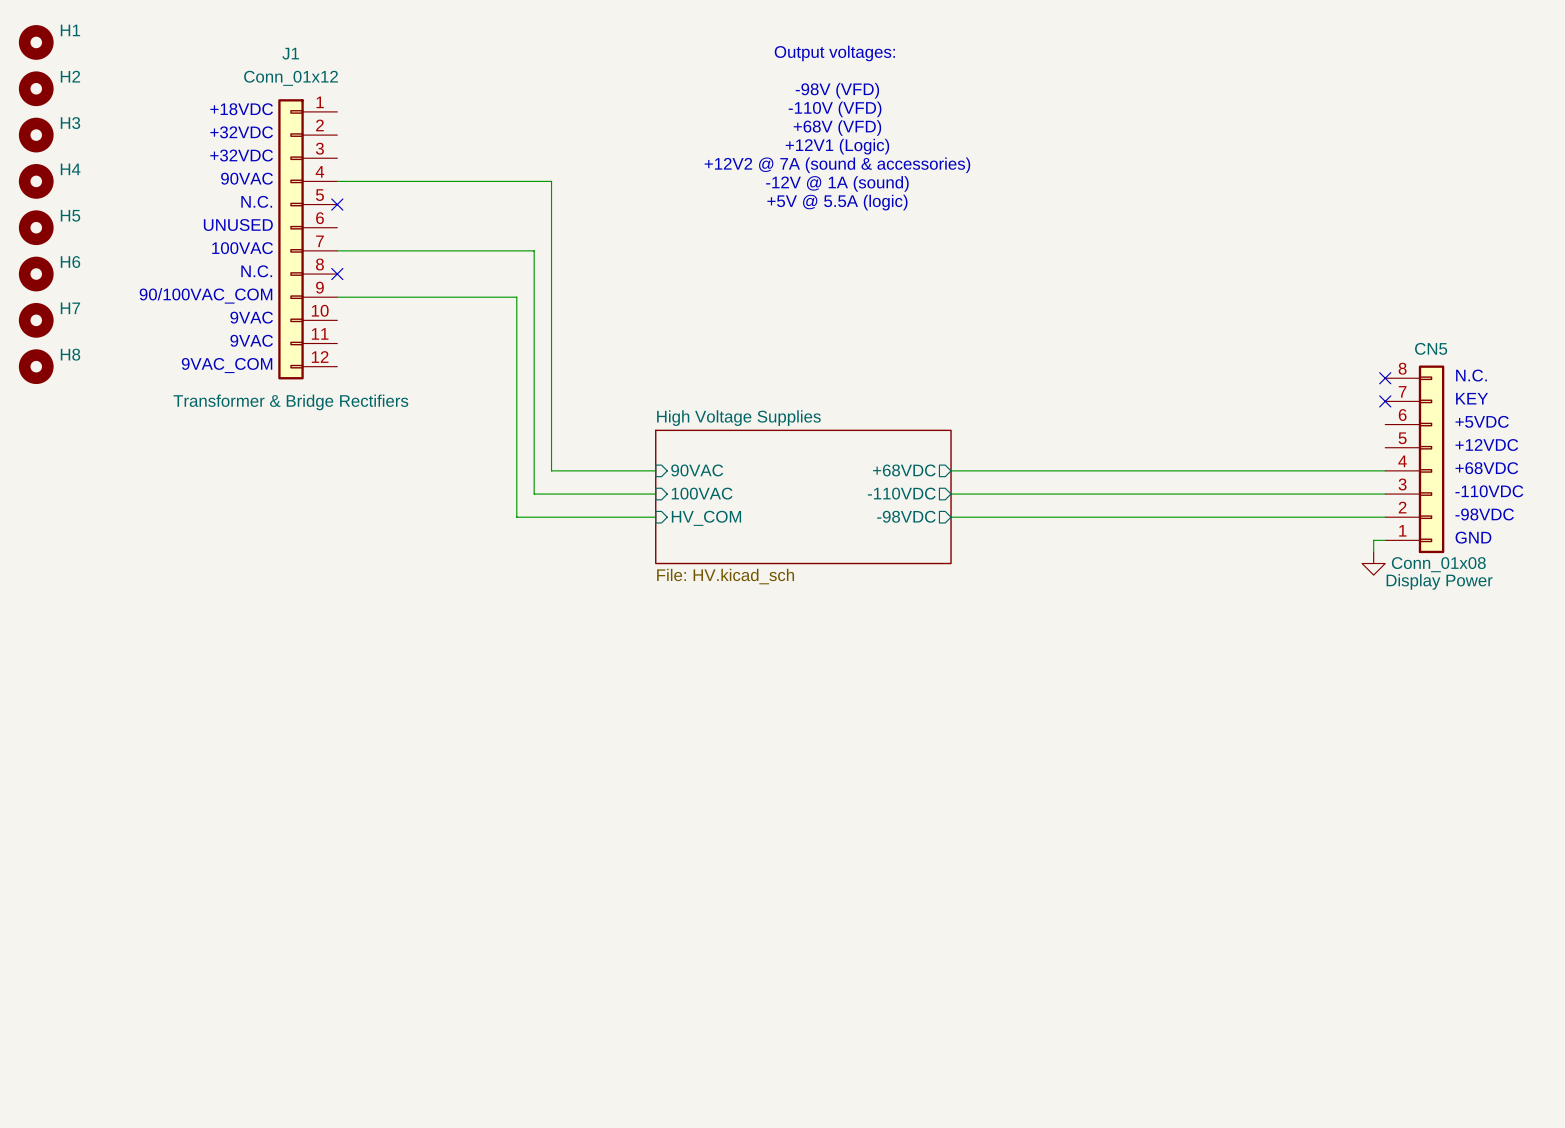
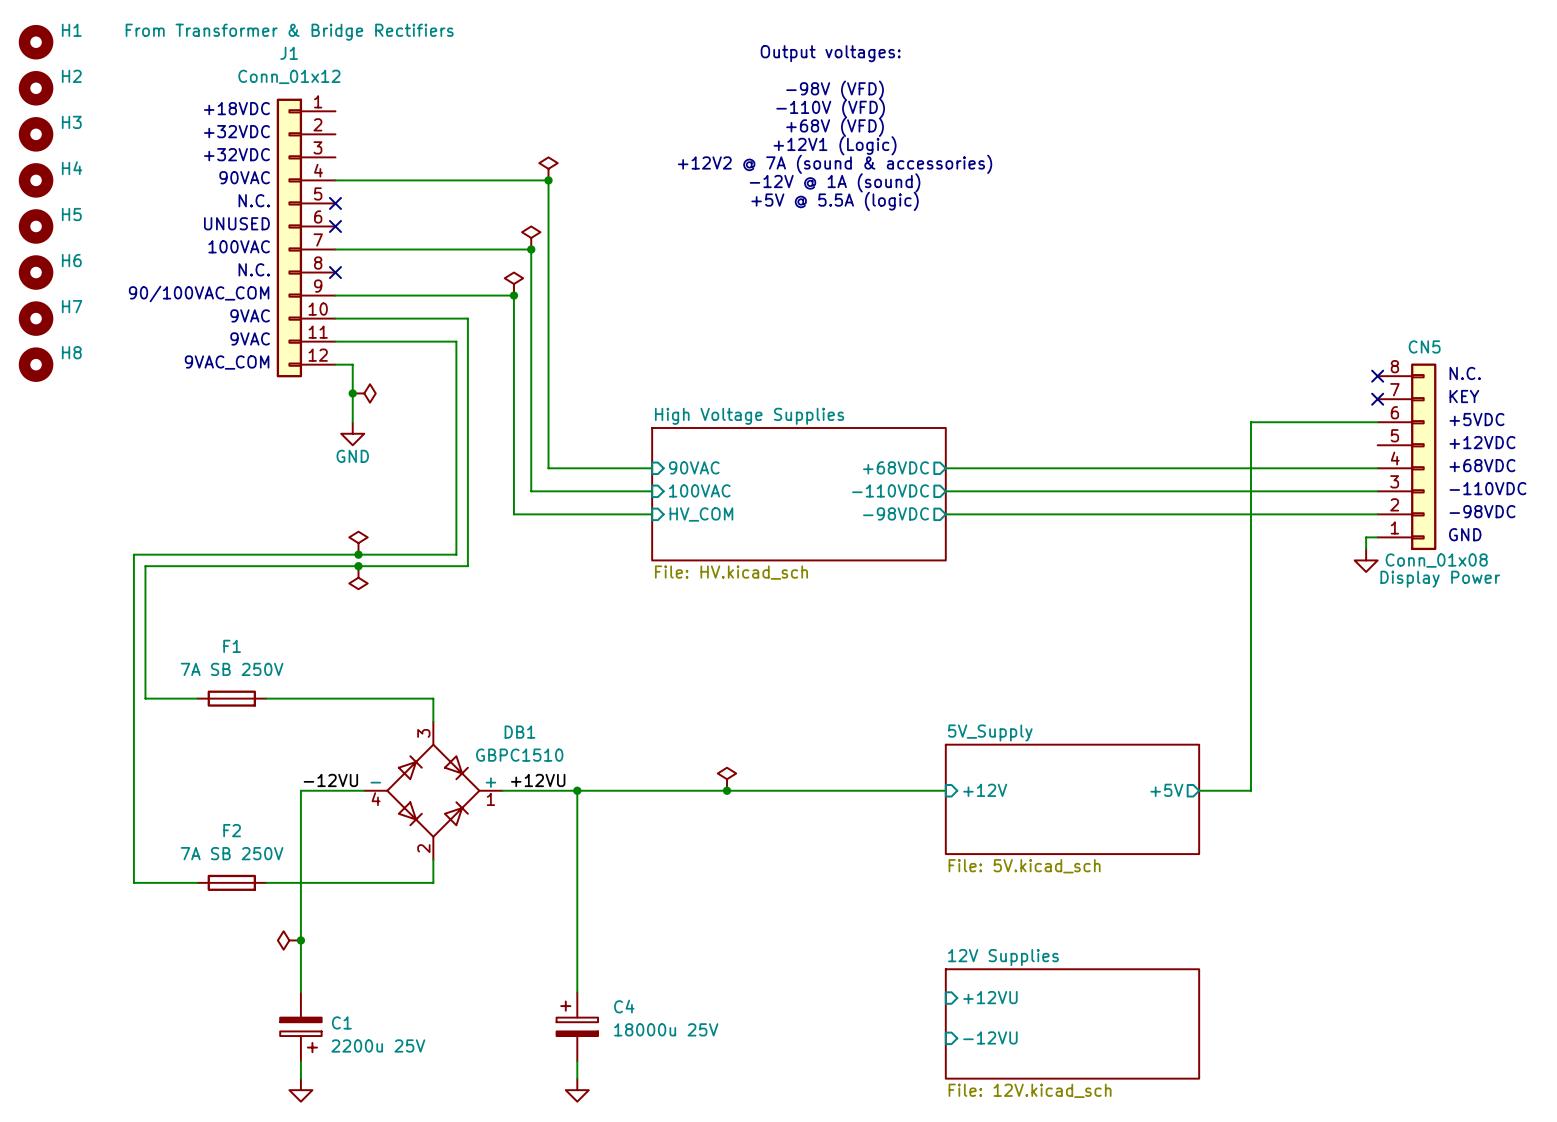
power symbol: none -> (548, 168)
junction: none -> (548, 180)
no-connect mark: none -> (335, 226)
power symbol: none -> (531, 237)
junction: none -> (531, 249)
power symbol: none -> (513, 284)
junction: none -> (513, 295)
wire: none -> (335, 318) (467, 318) (467, 566) (145, 566) (145, 698) (197, 698)
wire: none -> (335, 341) (456, 341) (456, 554) (133, 554) (133, 882) (197, 882)
wire: none -> (335, 364) (352, 364) (352, 422)
junction: none -> (352, 393)
power symbol: none -> (364, 393)
J1 text: Transformer & Bridge Rectifiers (290, 402) -> From Transformer & Bridge Rectifiers (289, 32)
wire: none -> (1377, 422) (1250, 422) (1250, 790) (1199, 790)
power symbol: none -> GND (352, 433)
power symbol: none -> (358, 543)
junction: none -> (358, 554)
junction: none -> (358, 566)
power symbol: none -> (358, 577)
F1: none -> 7A SB 250V (231, 698)
wire: none -> (266, 698) (433, 698) (433, 721)
power symbol: none -> (727, 779)
label: none -> -12VU (330, 780)
label: none -> +12VU (538, 780)
sheet pin: none -> +12V (985, 790)
sheet pin: none -> +5V (1166, 790)
wire: none -> (364, 790) (300, 790) (300, 992)
DB1: none -> GBPC1510 (433, 790)
wire: none -> (502, 790) (945, 790)
wire: none -> (577, 790) (577, 992)
junction: none -> (577, 790)
junction: none -> (727, 790)
sheet 5V_Supply: none -> File: 5V.kicad_sch (1072, 799)
wire: none -> (433, 859) (433, 882) (266, 882)
F2: none -> 7A SB 250V (231, 882)
power symbol: none -> (289, 940)
junction: none -> (300, 940)
sheet pin: none -> +12VU (990, 997)
sheet 12V Supplies: none -> File: 12V.kicad_sch (1072, 1023)
C1: none -> 2200u 25V (300, 1026)
C4: none -> 18000u 25V (577, 1026)
sheet pin: none -> -12VU (990, 1037)
wire: none -> (300, 1061) (300, 1078)
wire: none -> (577, 1061) (577, 1078)
power symbol: none -> (300, 1090)
power symbol: none -> (577, 1090)

